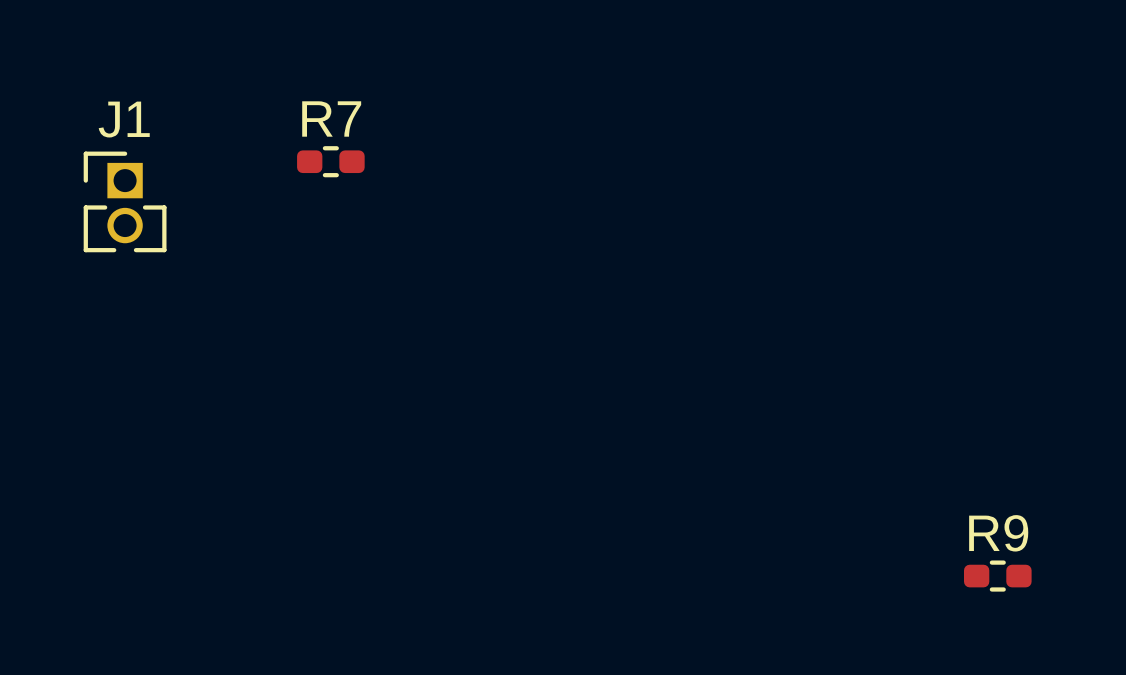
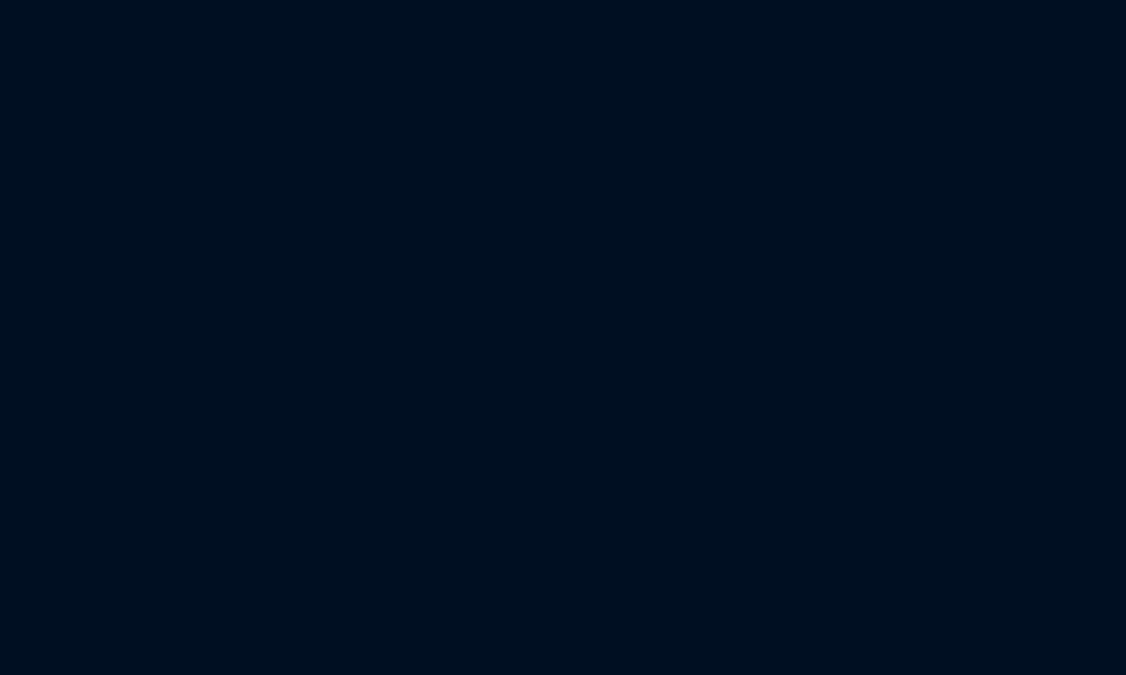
R7: (330, 161) -> none
J1: (125, 201) -> none
R9: (997, 576) -> none

